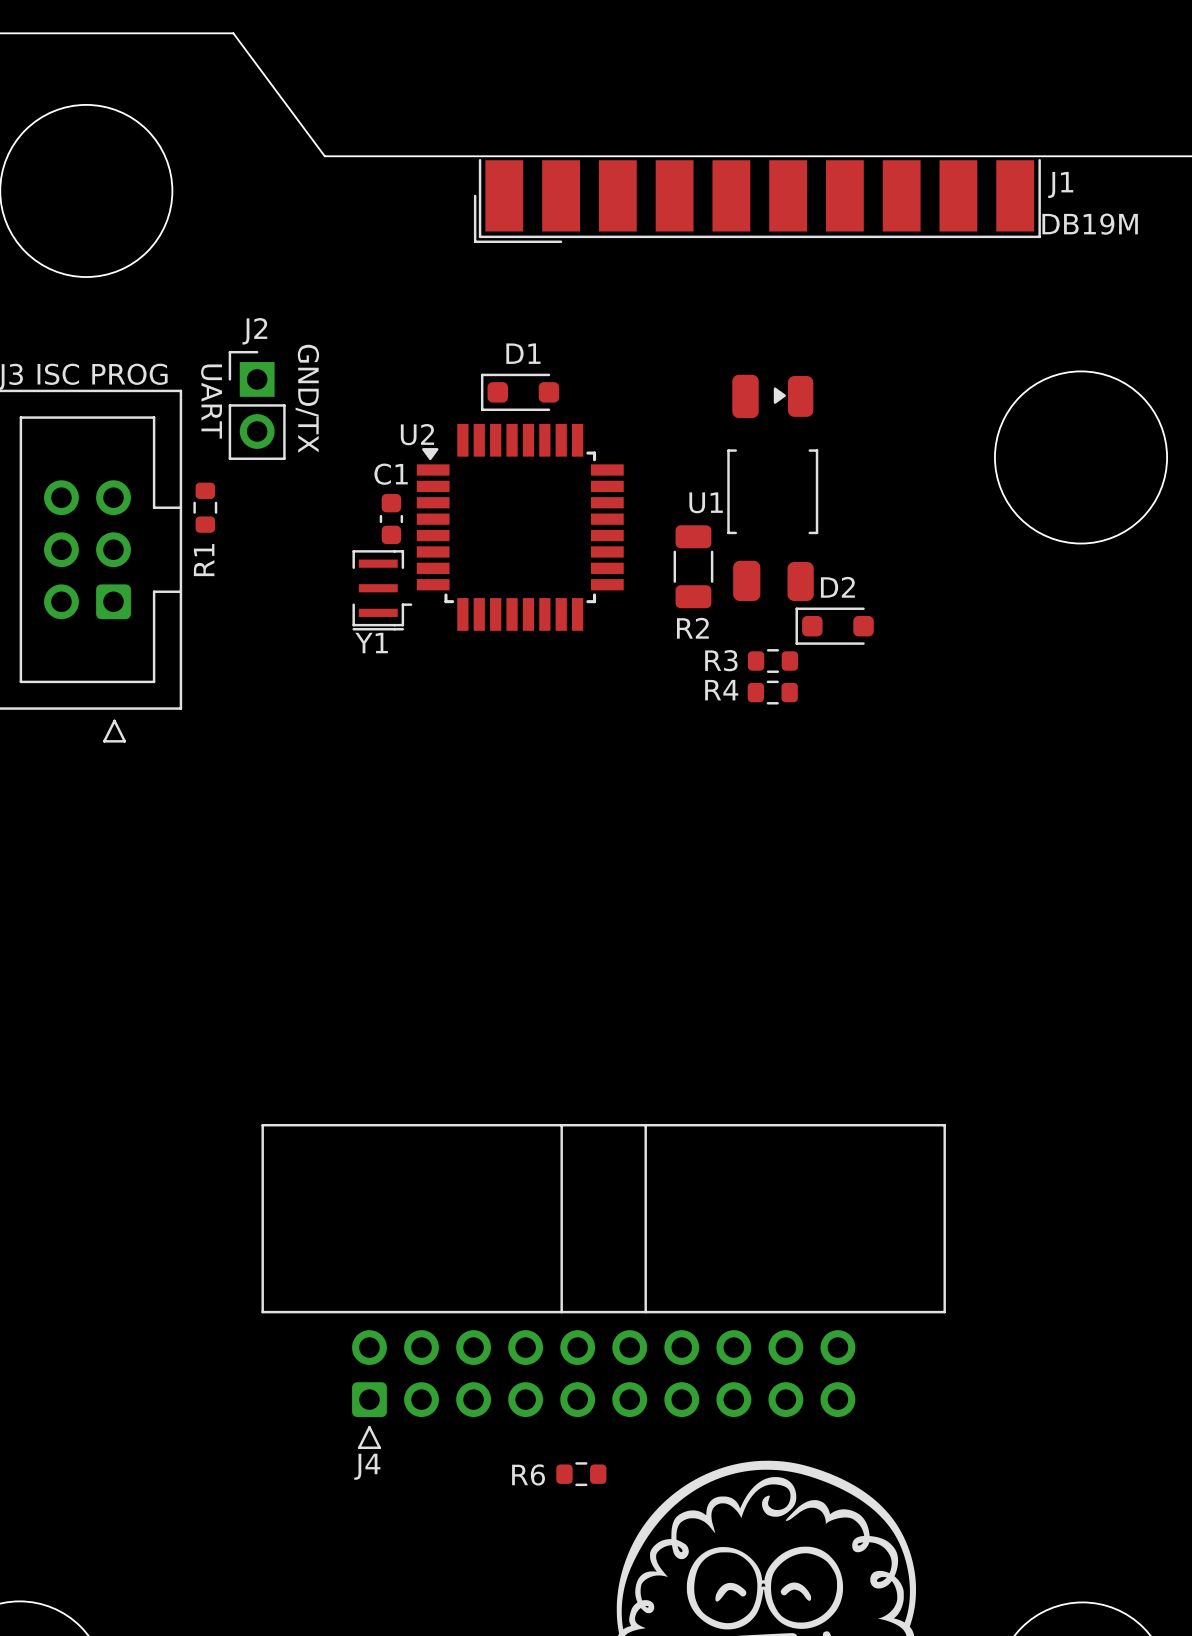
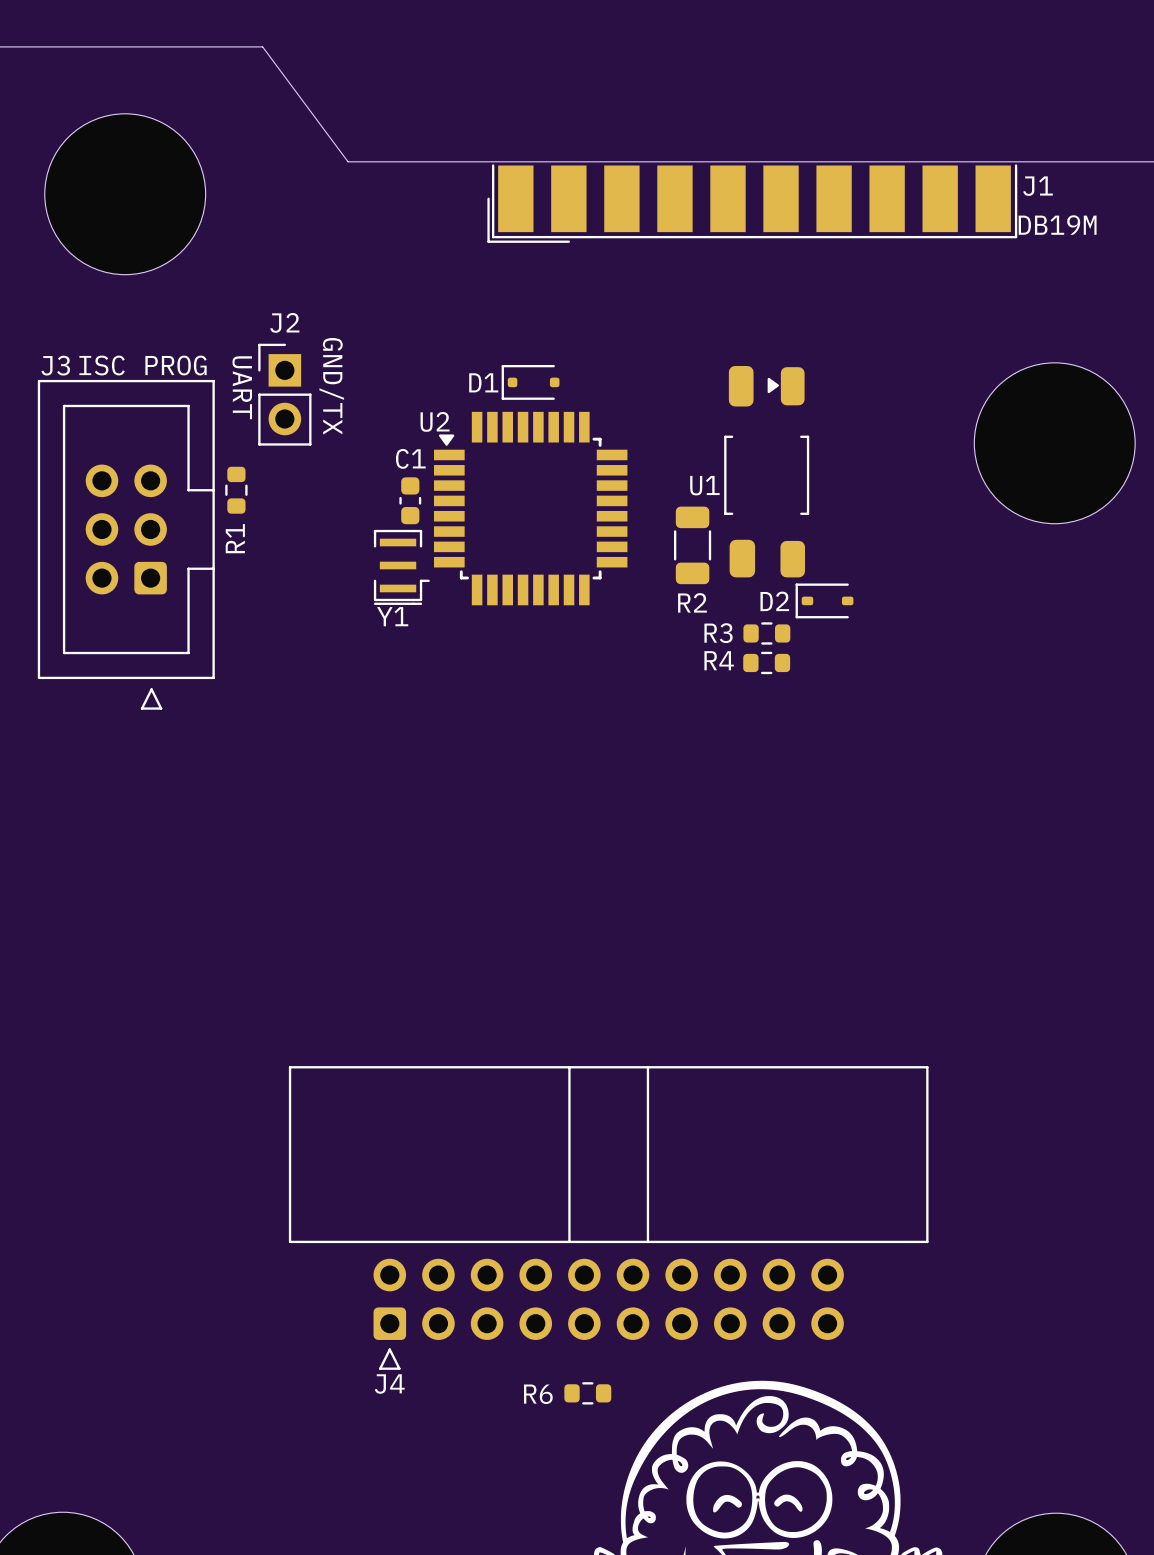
D1 name position: D1 (523, 353) -> D1 (483, 382)
D1 footprint: [480, 373, 560, 412] -> [501, 364, 560, 400]
D2 name position: D2 (837, 587) -> D2 (774, 601)
D2 footprint: [795, 607, 874, 645] -> [795, 583, 854, 619]

